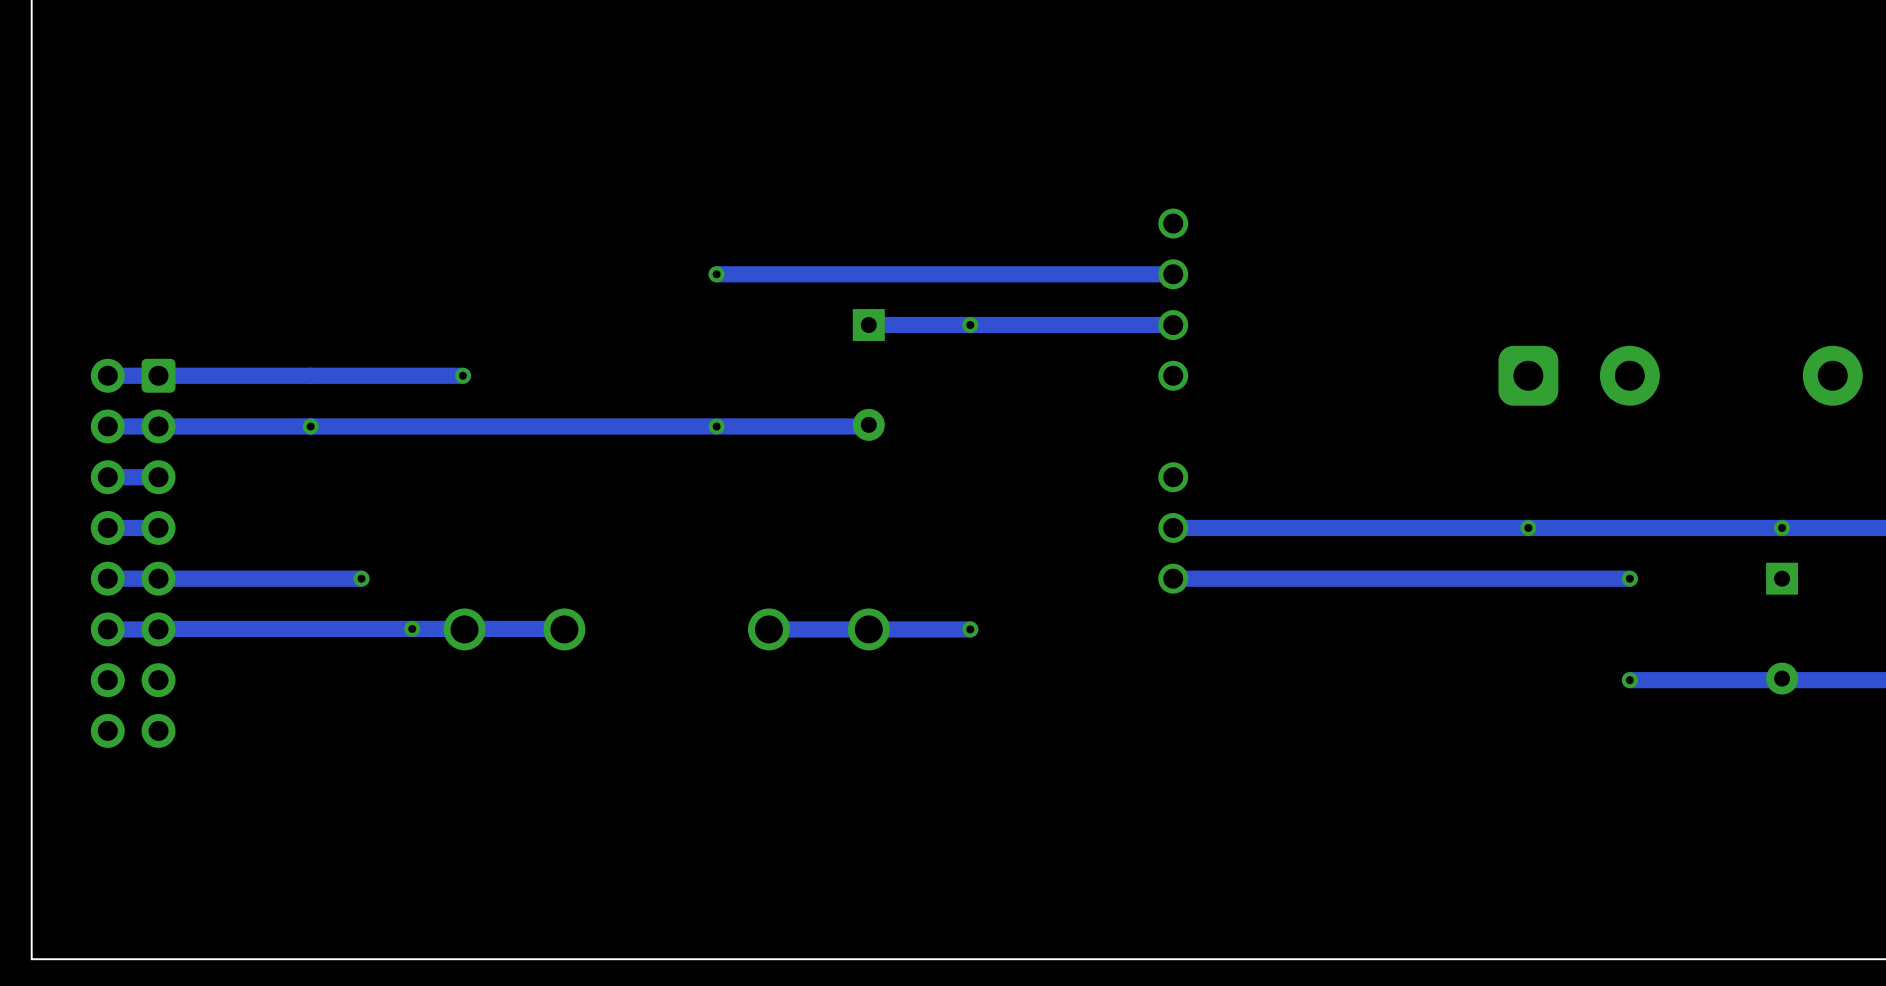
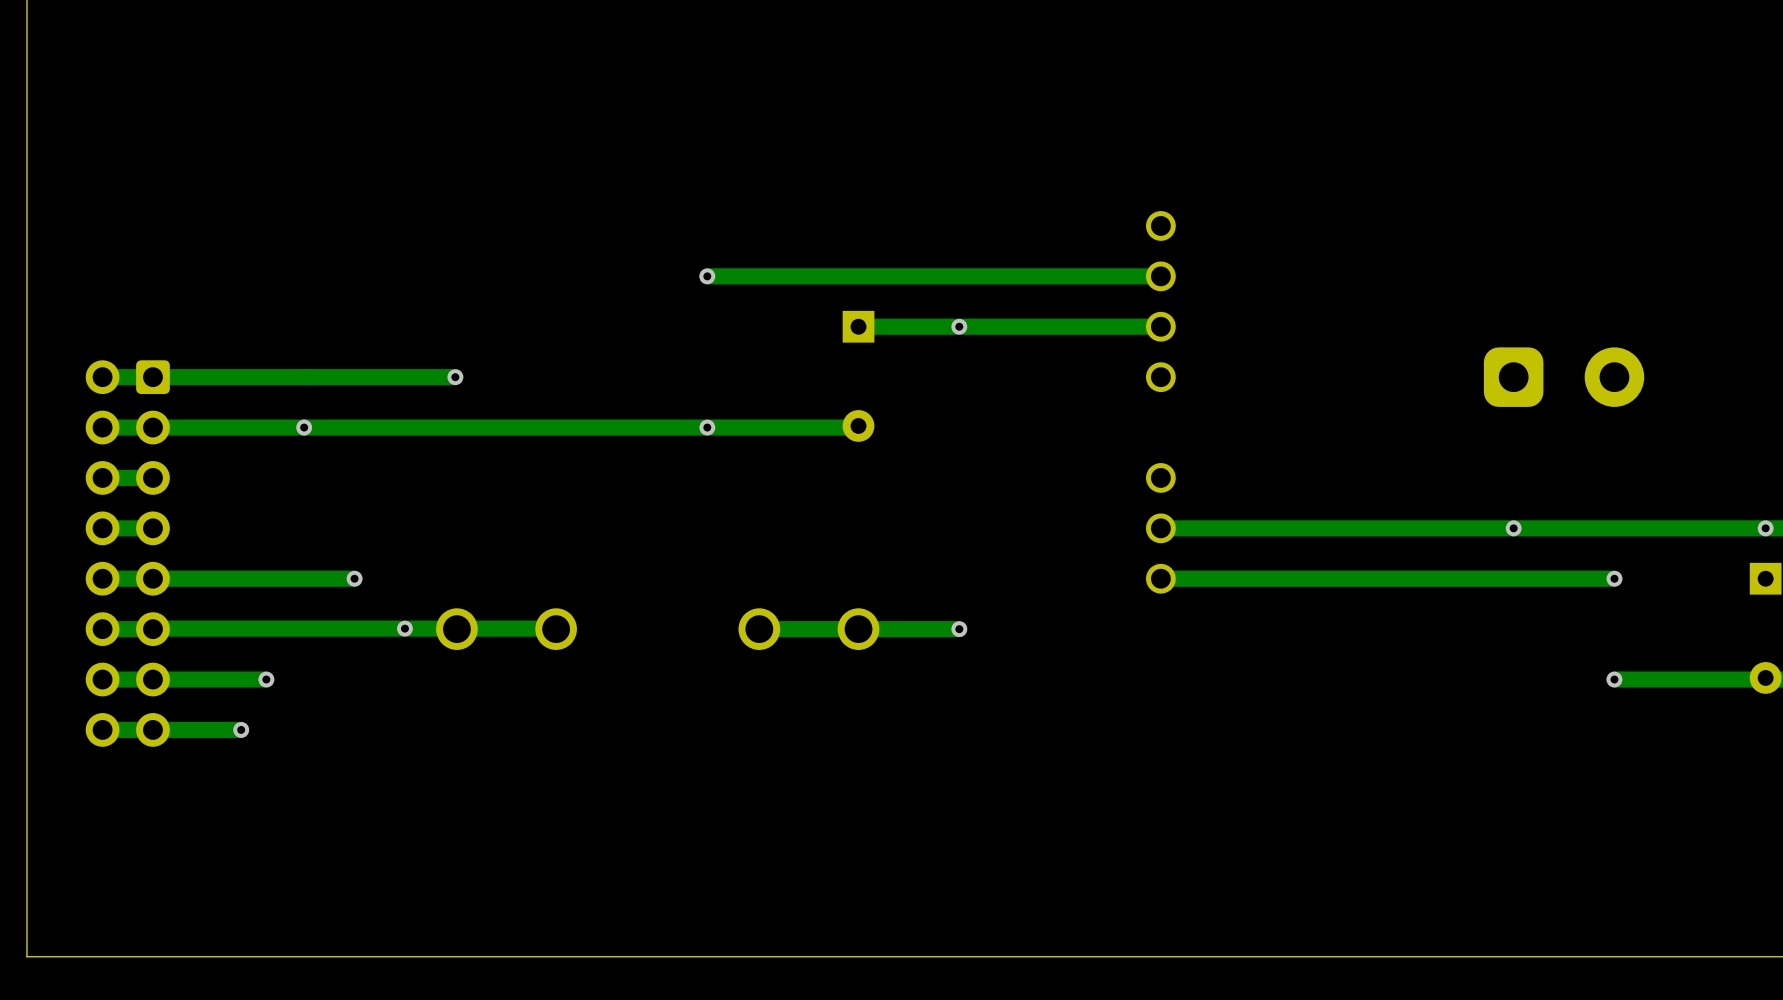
track: none -> (266, 679) (102, 679)
via: none -> (266, 679)
track: none -> (241, 729) (102, 729)
via: none -> (241, 729)

